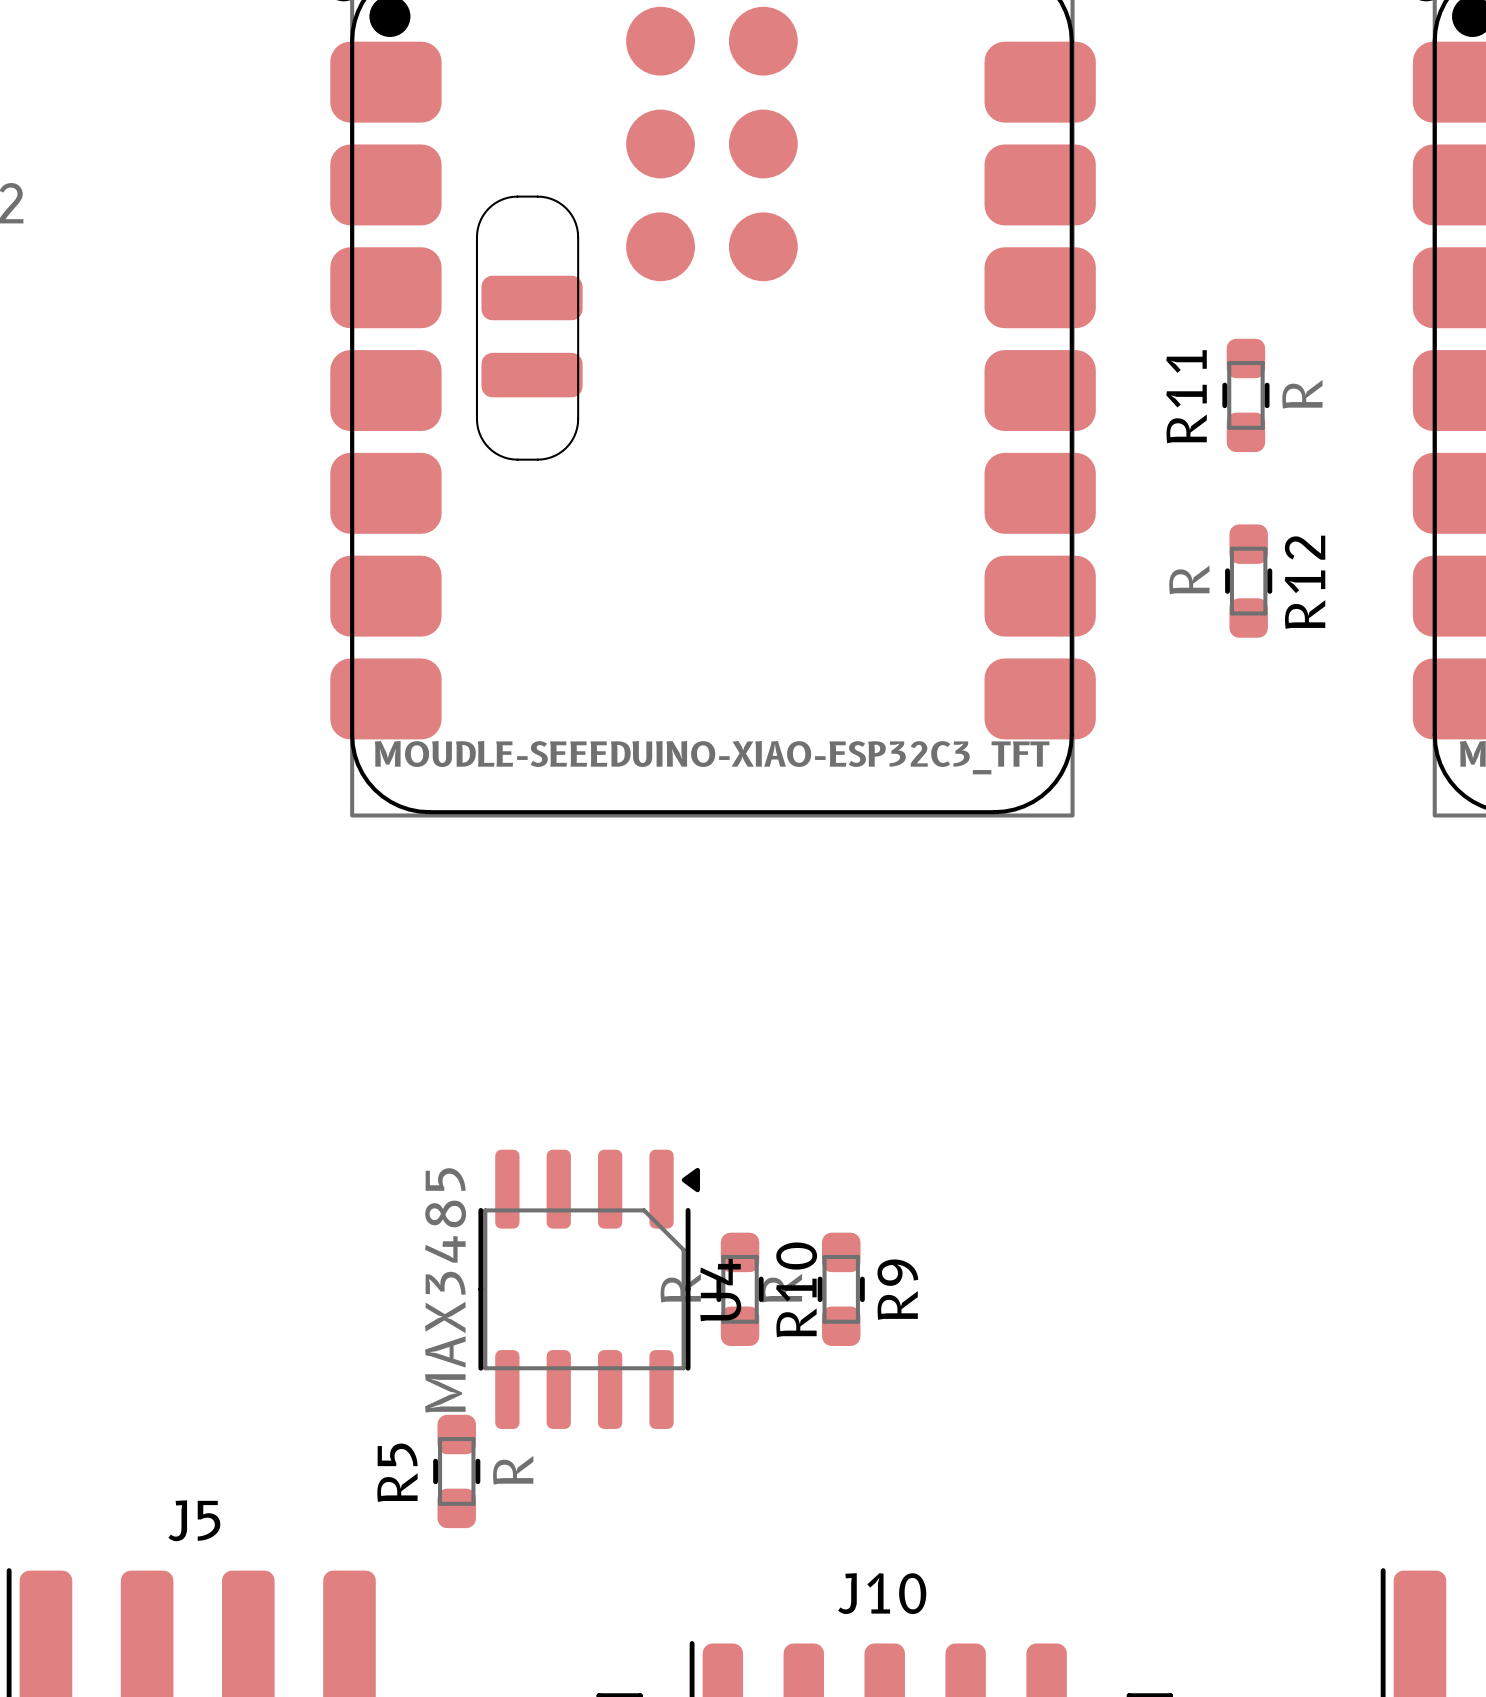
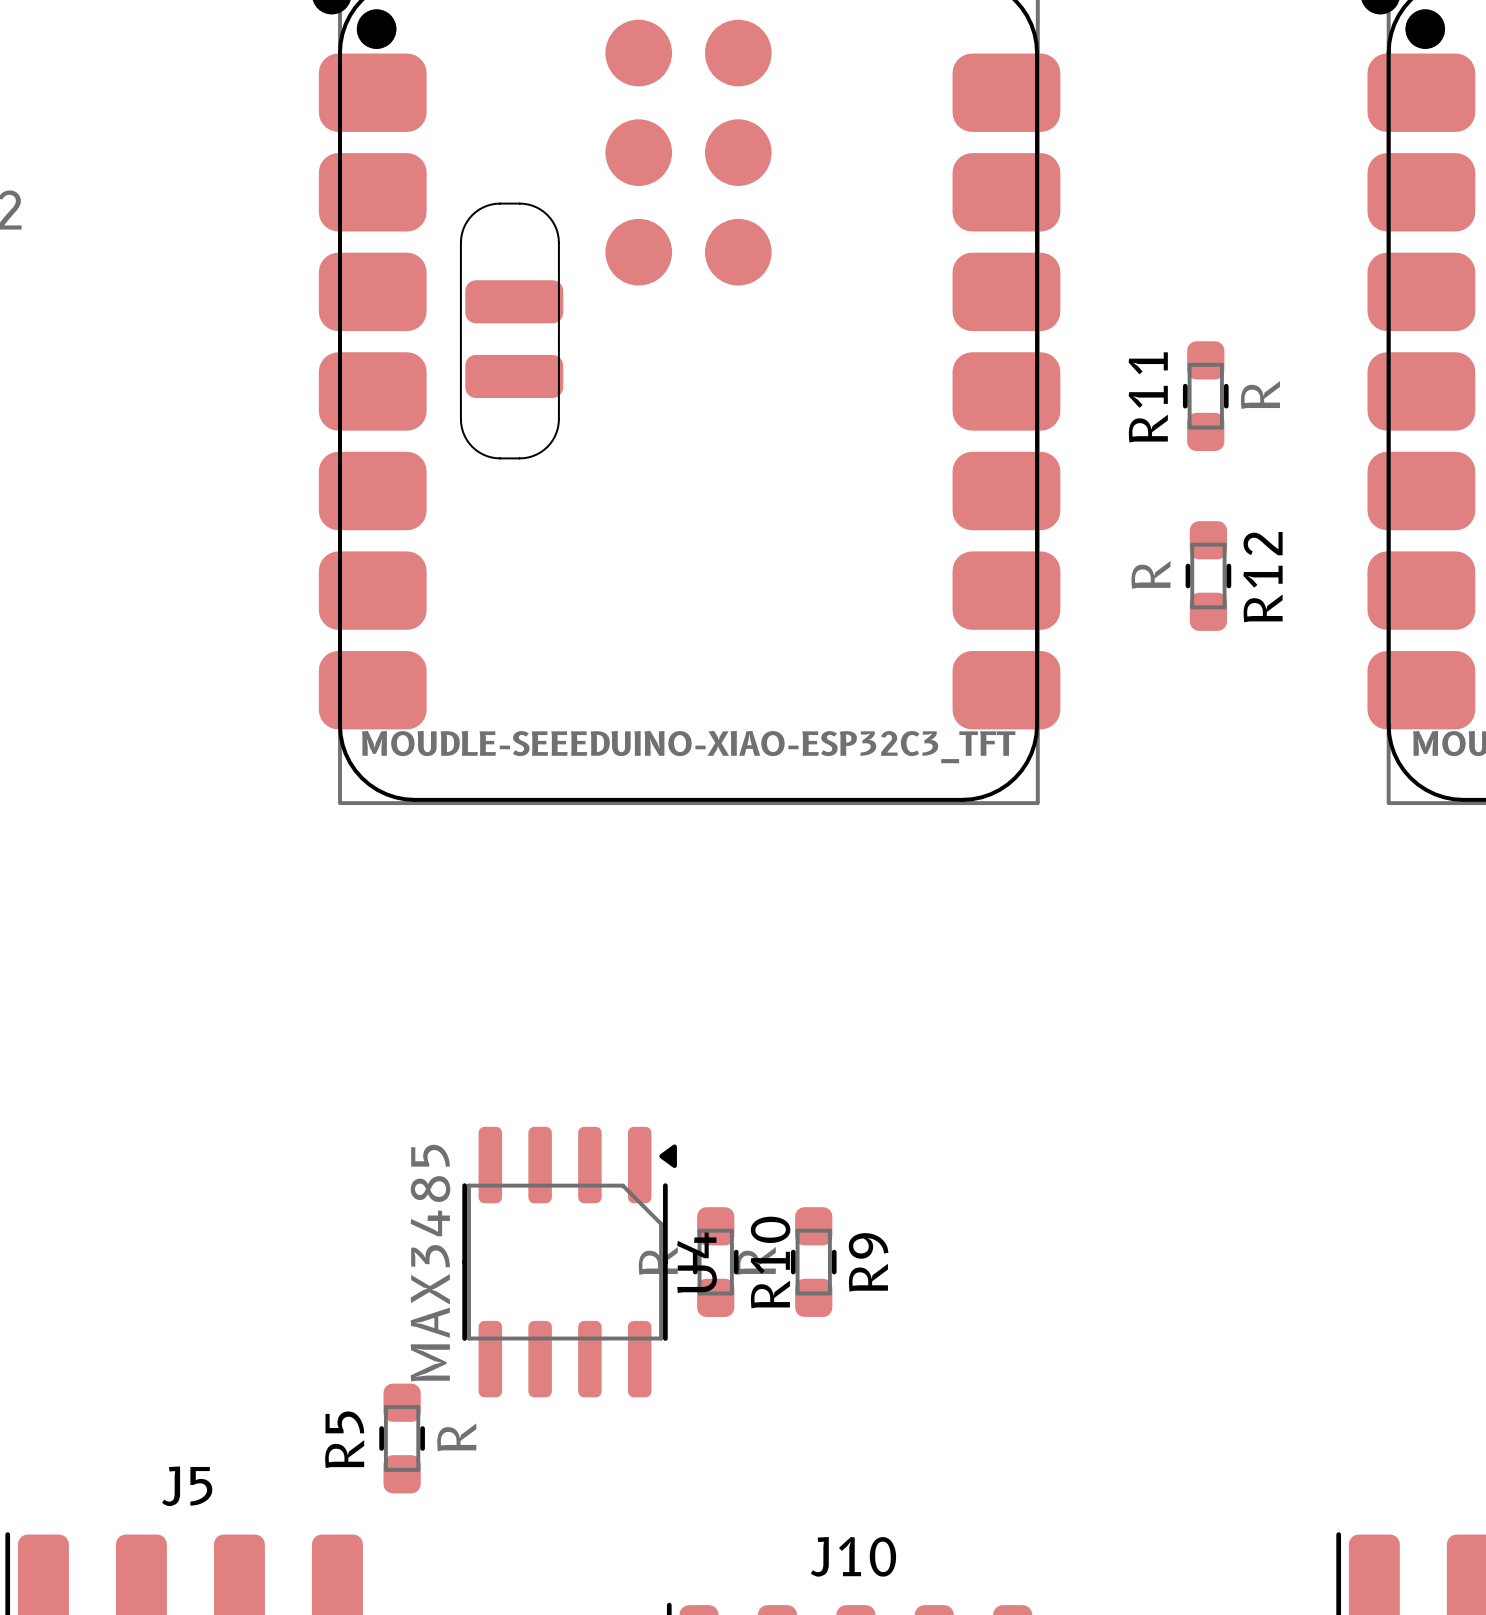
R5 position: (456, 1471) -> (402, 1438)

